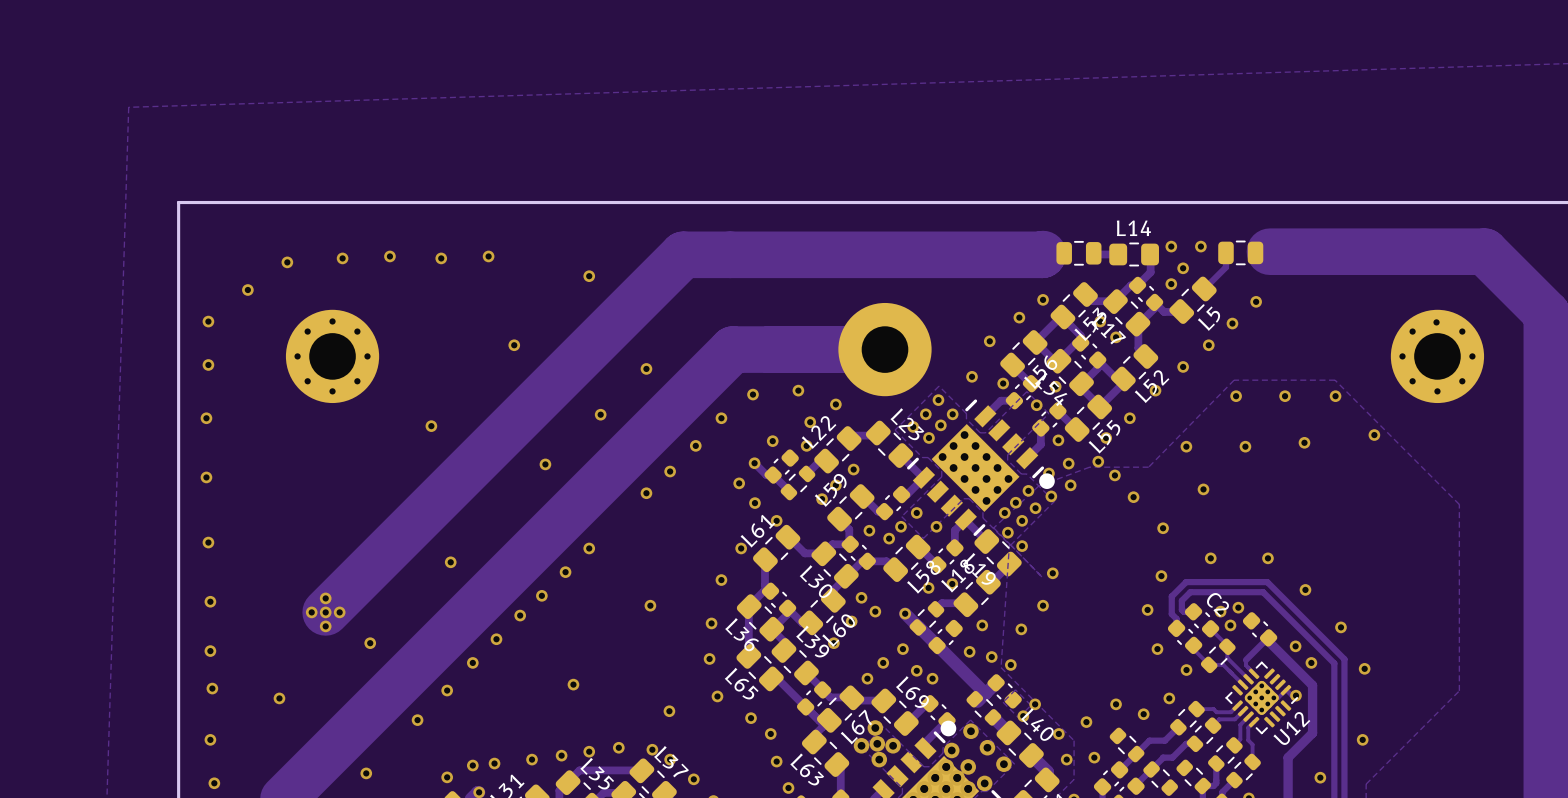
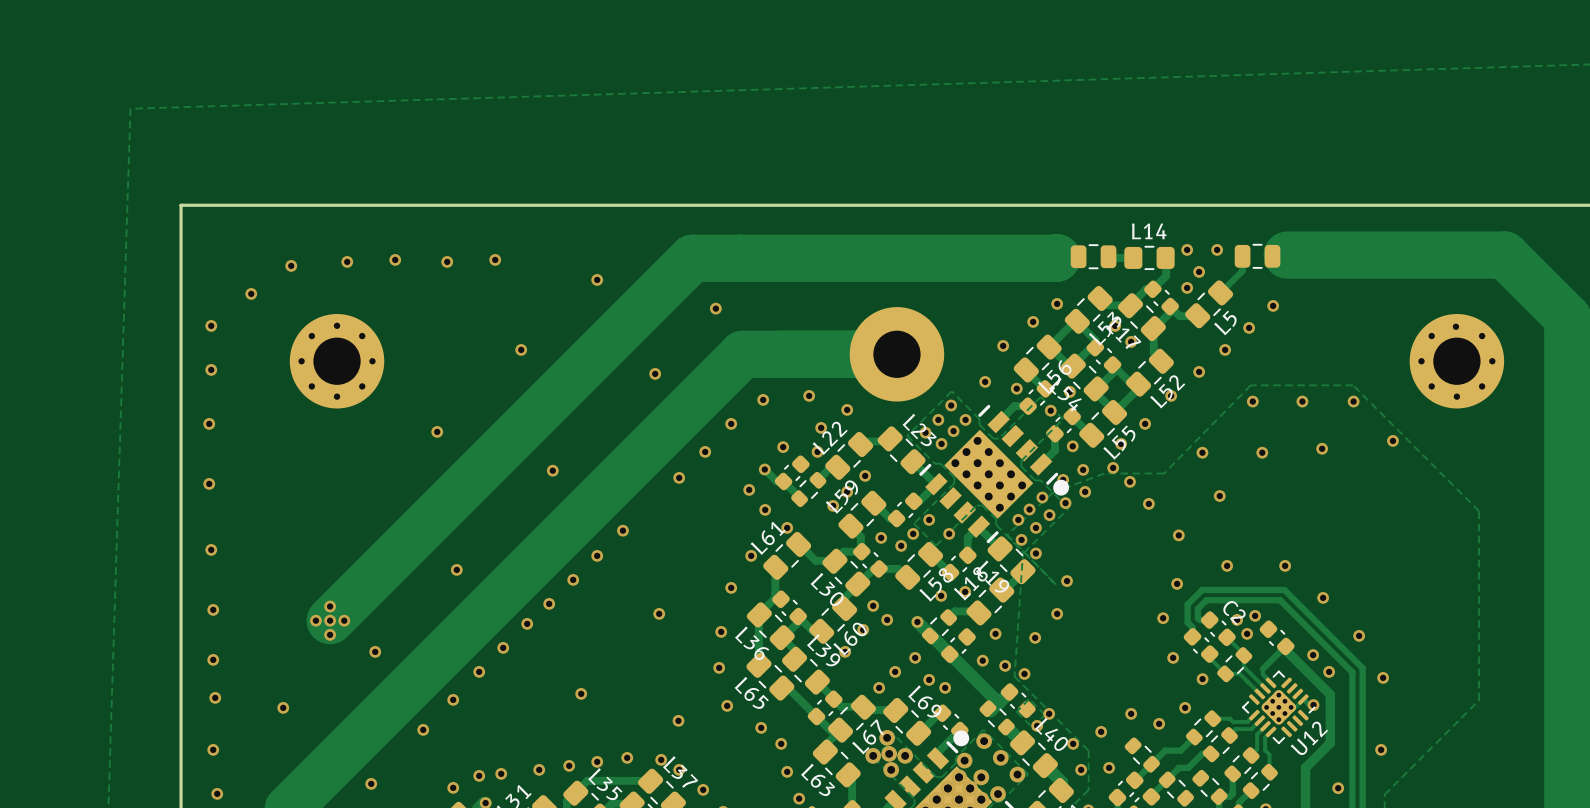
via: none -> (715, 308)
via: (600, 414) -> none
via position: (646, 493) -> (622, 530)

